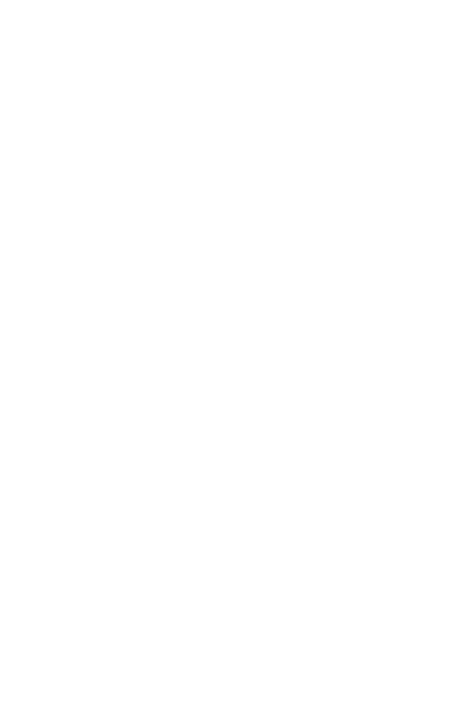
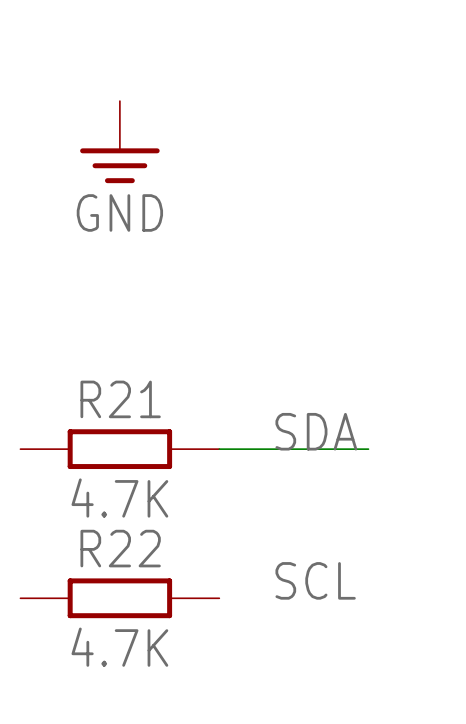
power symbol: none -> GND (119, 142)
label: none -> SDA (316, 431)
R21: none -> 4.7K (119, 449)
wire: none -> (219, 449) (368, 449)
label: none -> SCL (315, 580)
R22: none -> 4.7K (119, 598)

